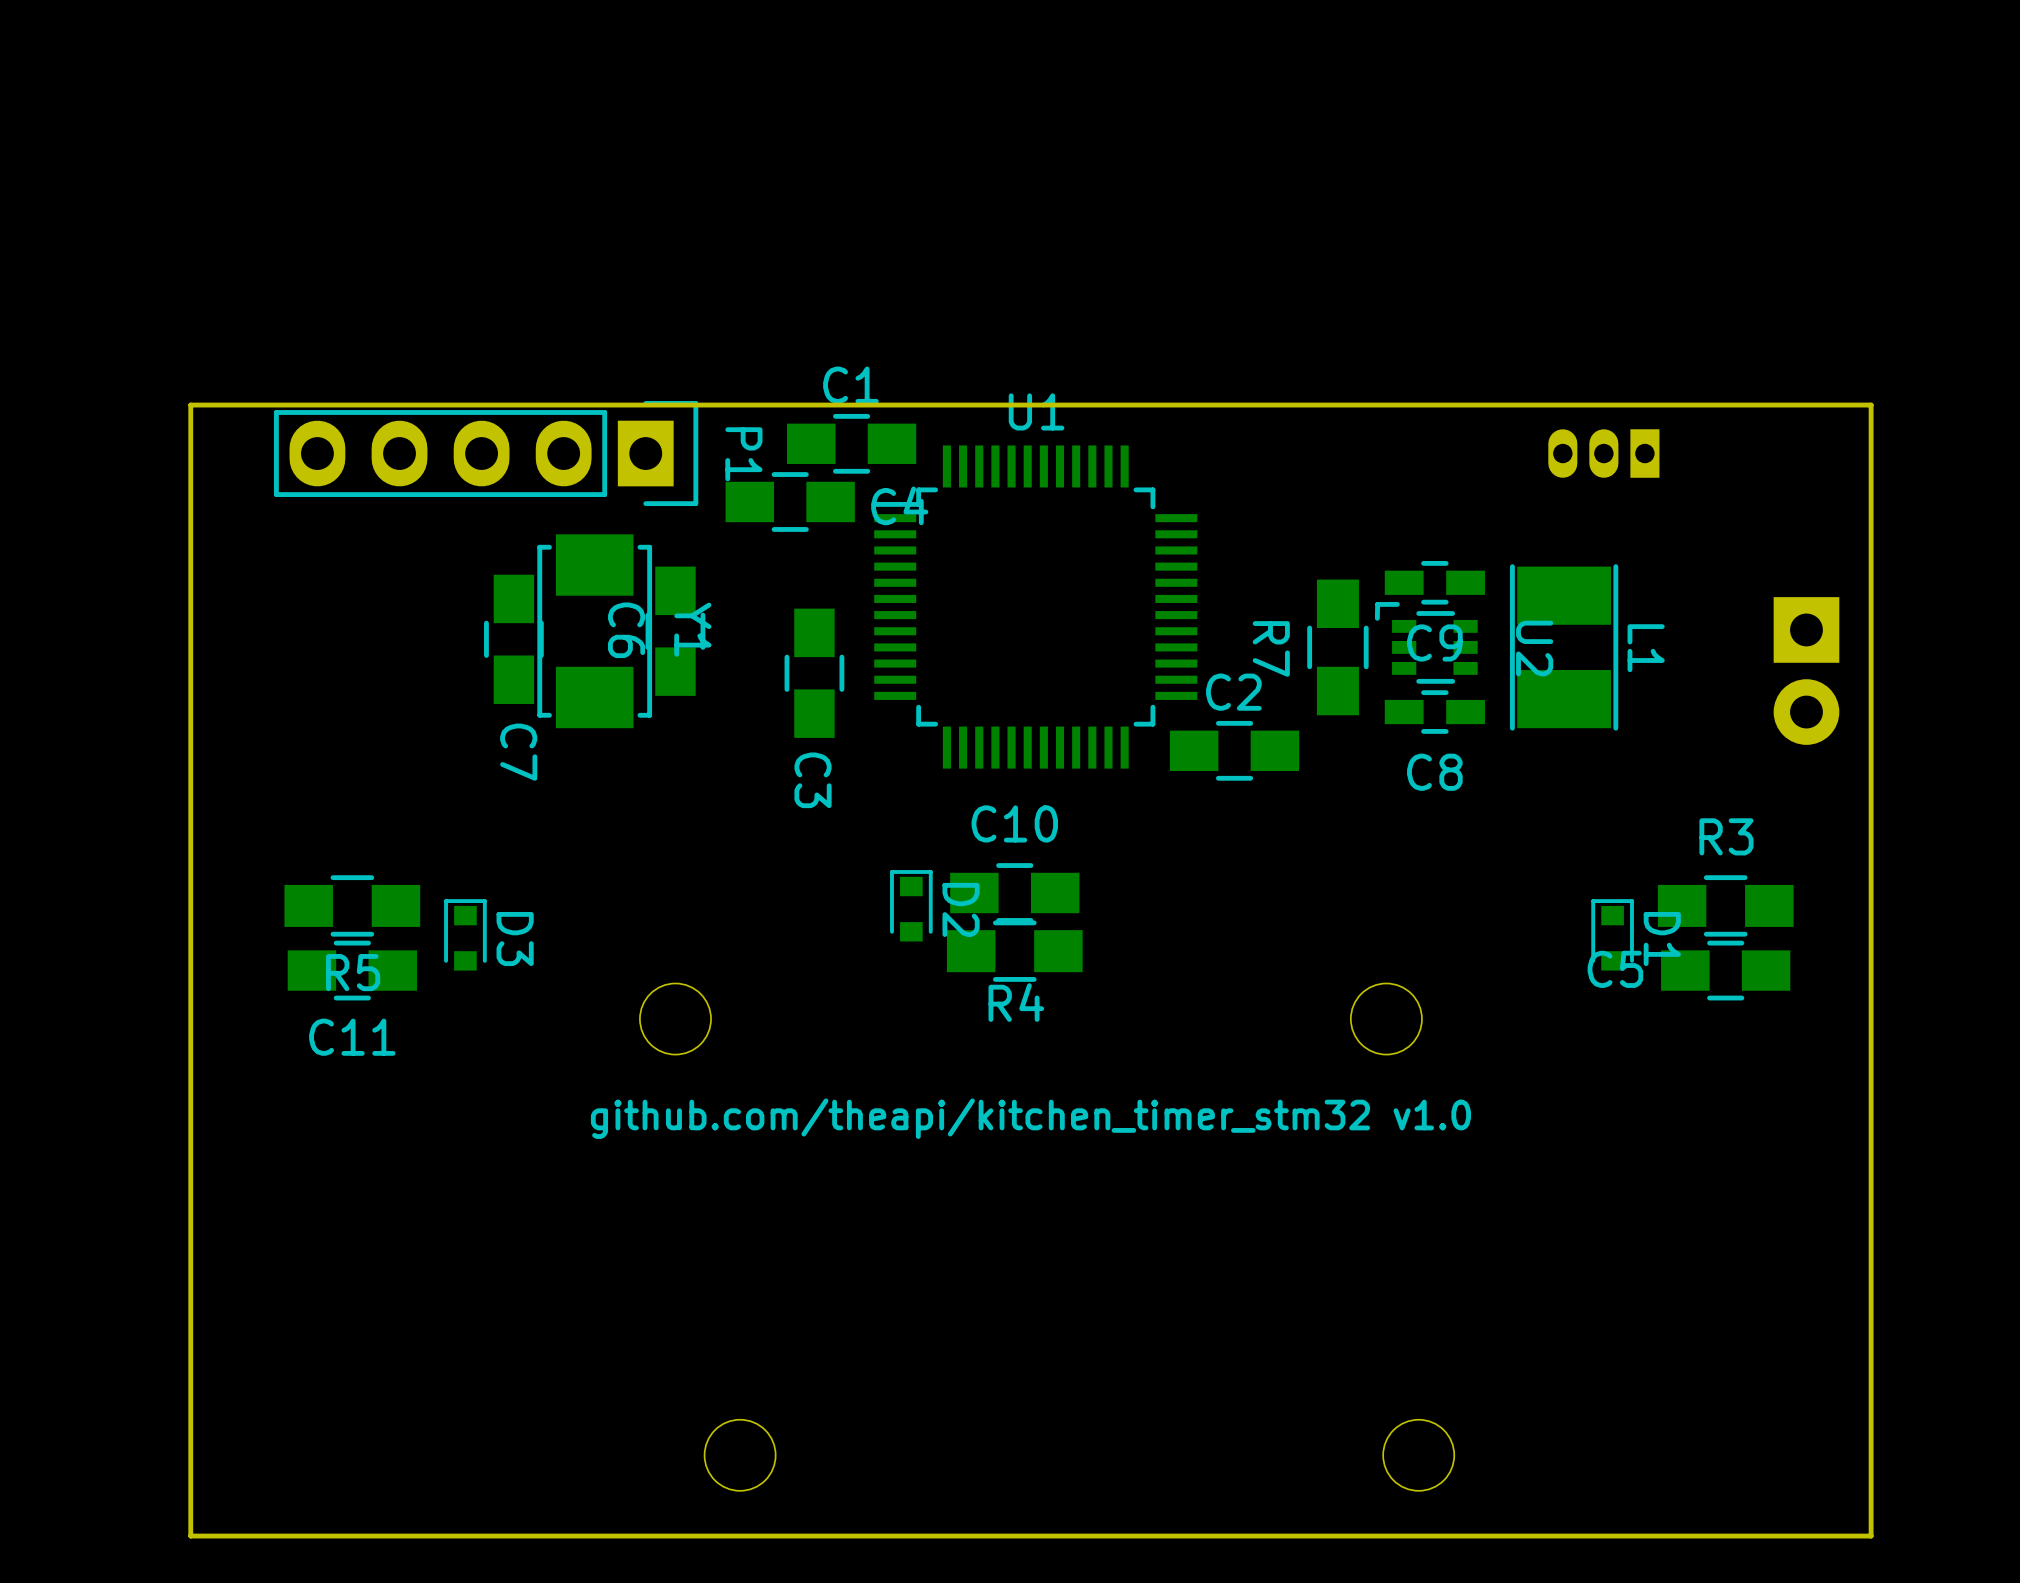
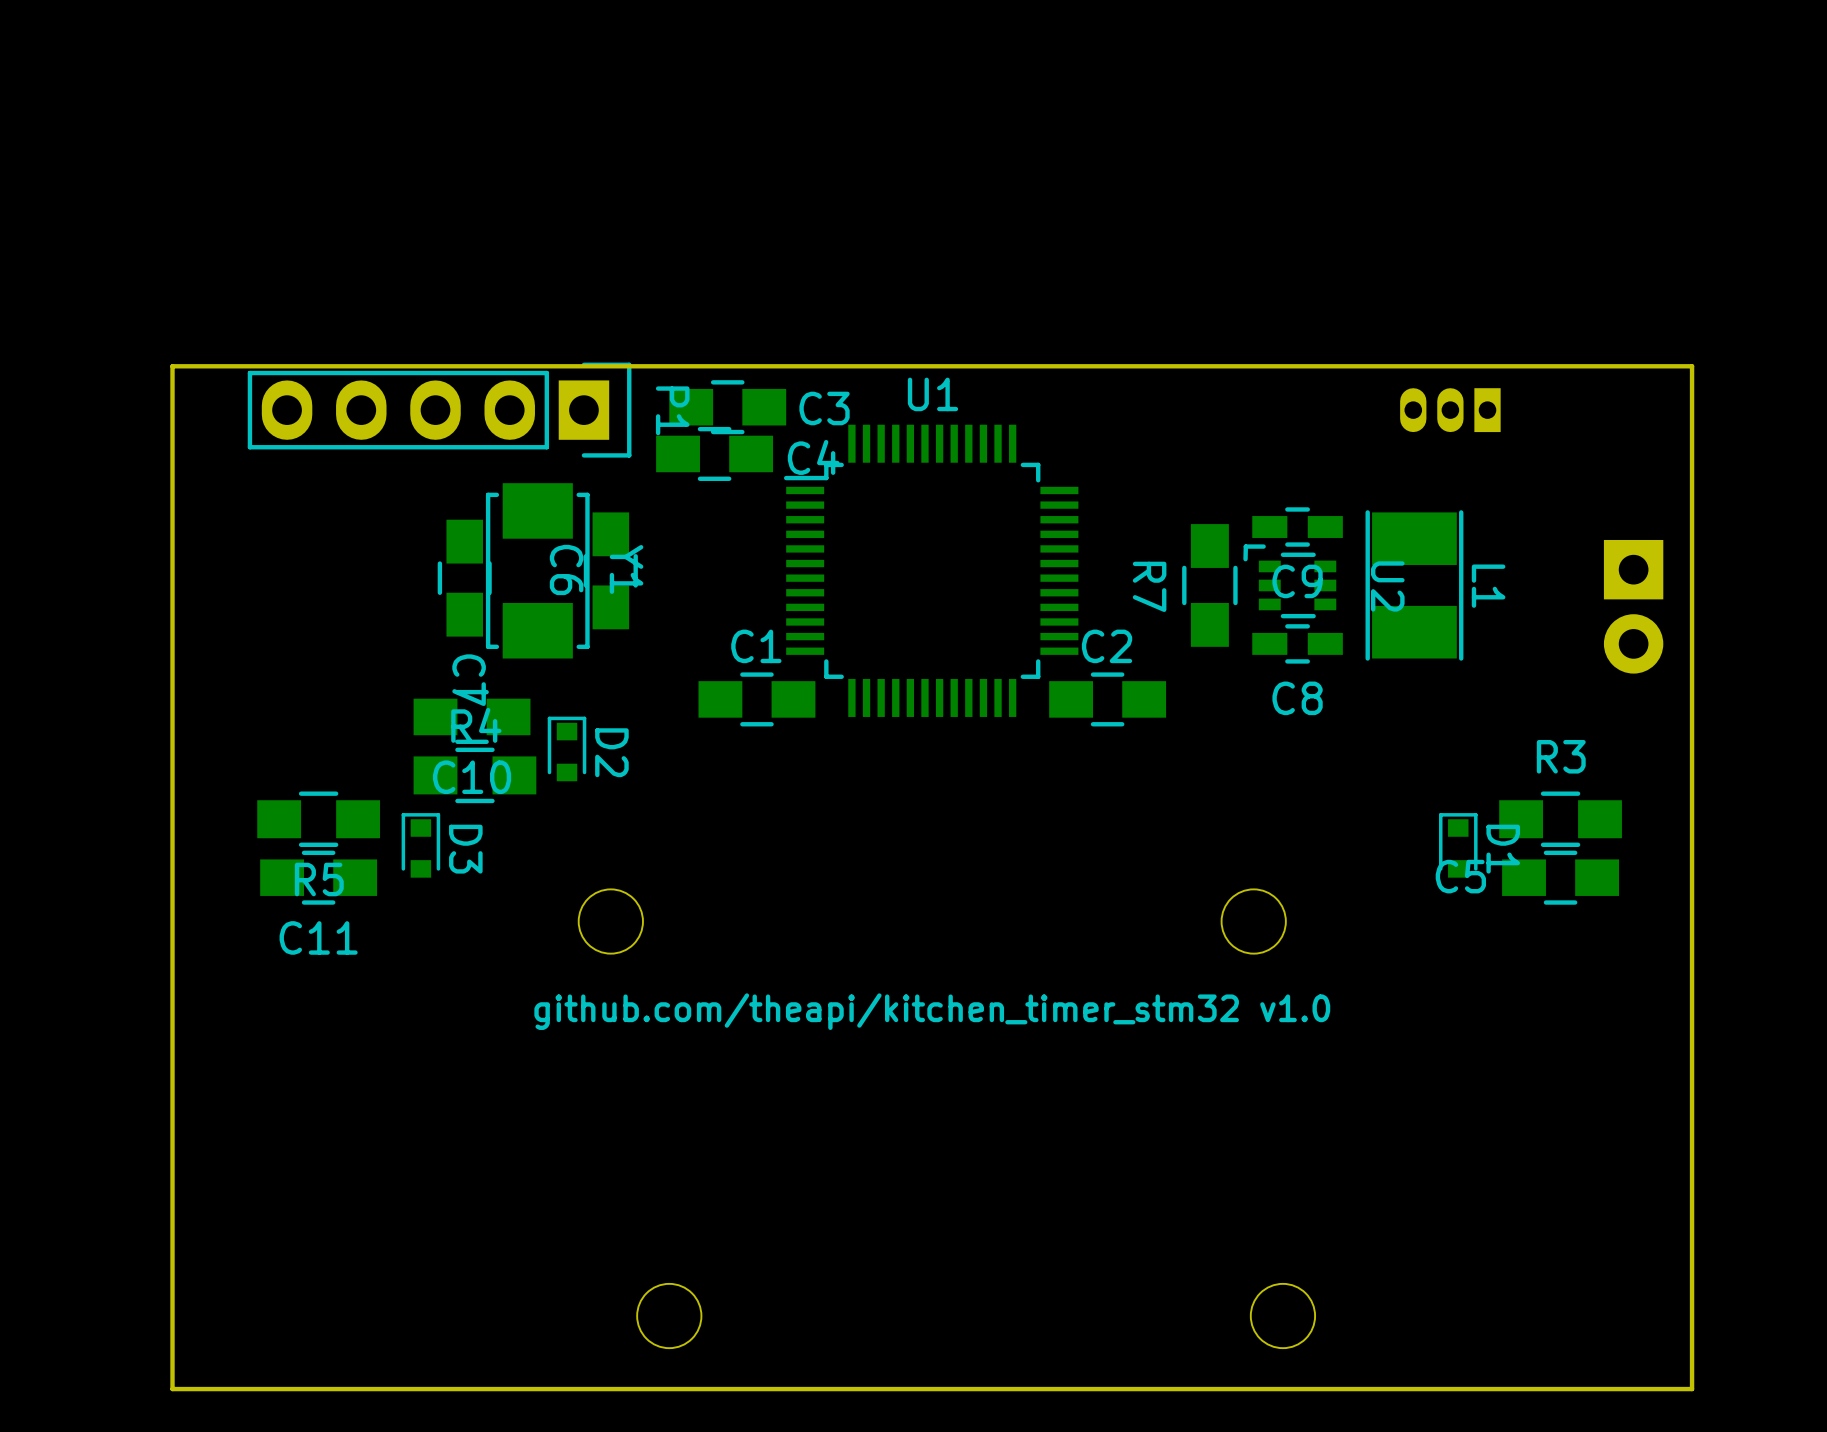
C1 position: (851, 443) -> (756, 699)
U1 position: (1034, 607) -> (931, 570)
C3 rotation: 0° (814, 673) -> 90° clockwise (727, 407)
C3 position: (814, 673) -> (727, 407)
C2 position: (1234, 750) -> (1107, 699)
C3 name position: C3 (813, 780) -> C3 (824, 408)
C10 name position: C10 (1014, 823) -> C10 (472, 777)
C10 position: (1014, 893) -> (472, 716)
D2 position: (911, 905) -> (567, 748)
R4 position: (1014, 951) -> (474, 775)
R4 name position: R4 (1016, 1002) -> R4 (476, 725)

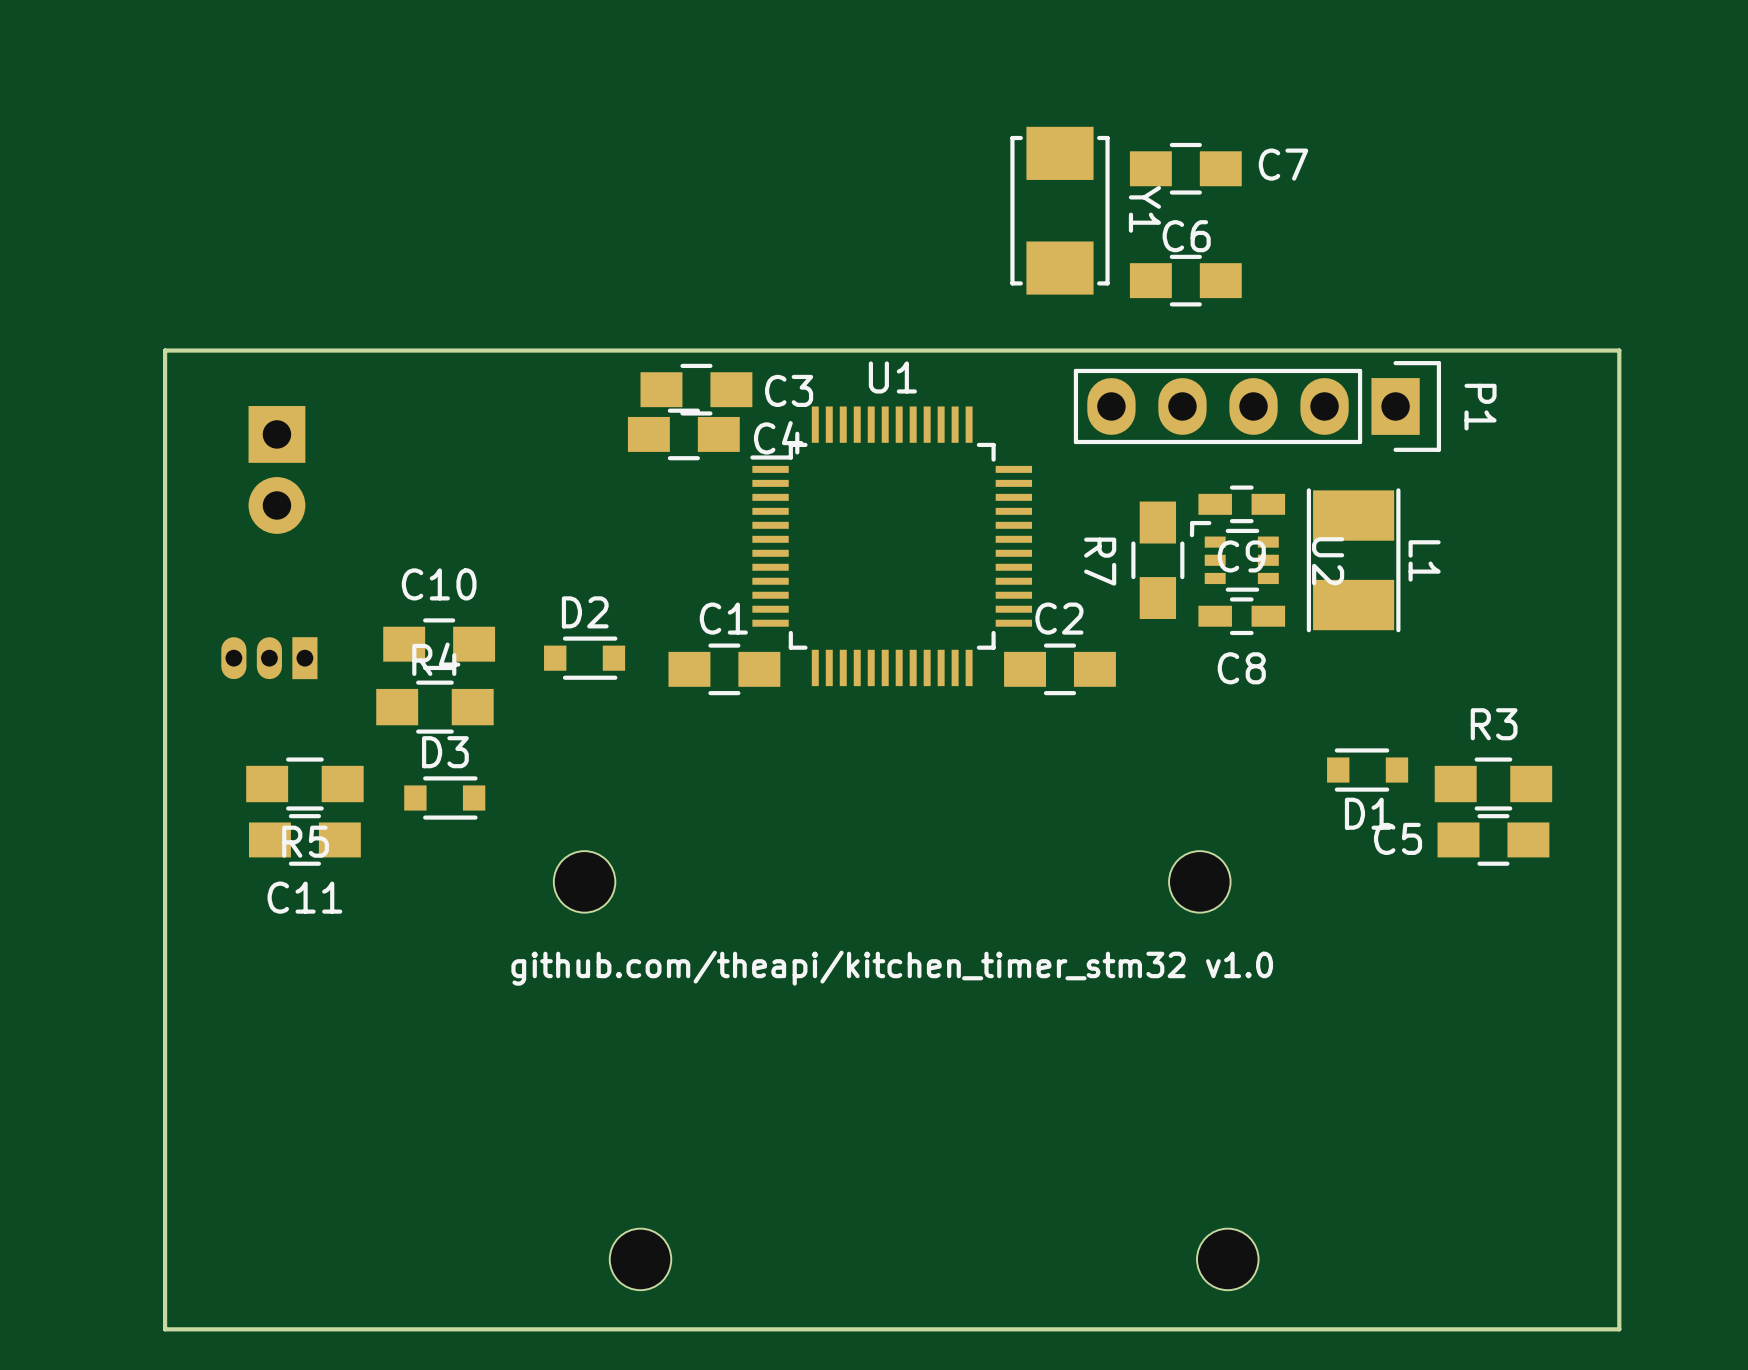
P1 position: (439, 410) -> (1257, 406)
part: (1450, 410) -> none
part: none -> (276, 469)
Y1 position: (537, 570) -> (1059, 210)
C6 rotation: 0° (610, 570) -> 90° clockwise (1185, 280)
C6 position: (610, 570) -> (1185, 280)
C7 rotation: 0° (464, 578) -> 90° clockwise (1185, 168)
C7 position: (464, 578) -> (1185, 168)
part: (1633, 606) -> none
C7 name position: C7 (469, 680) -> C7 (1283, 164)
part: none -> (269, 658)
C10 position: (472, 716) -> (439, 644)
D2 footprint: [547, 716, 587, 782] -> [544, 636, 626, 680]
D2 name position: D2 (611, 752) -> D2 (585, 612)
R4 position: (474, 775) -> (434, 707)
C10 name position: C10 (472, 777) -> C10 (439, 584)
D3 footprint: [401, 813, 441, 878] -> [404, 776, 486, 820]
D1 footprint: [1438, 813, 1478, 878] -> [1327, 748, 1409, 792]
D3 name position: D3 (465, 849) -> D3 (445, 752)
D1 name position: D1 (1503, 849) -> D1 (1368, 813)

